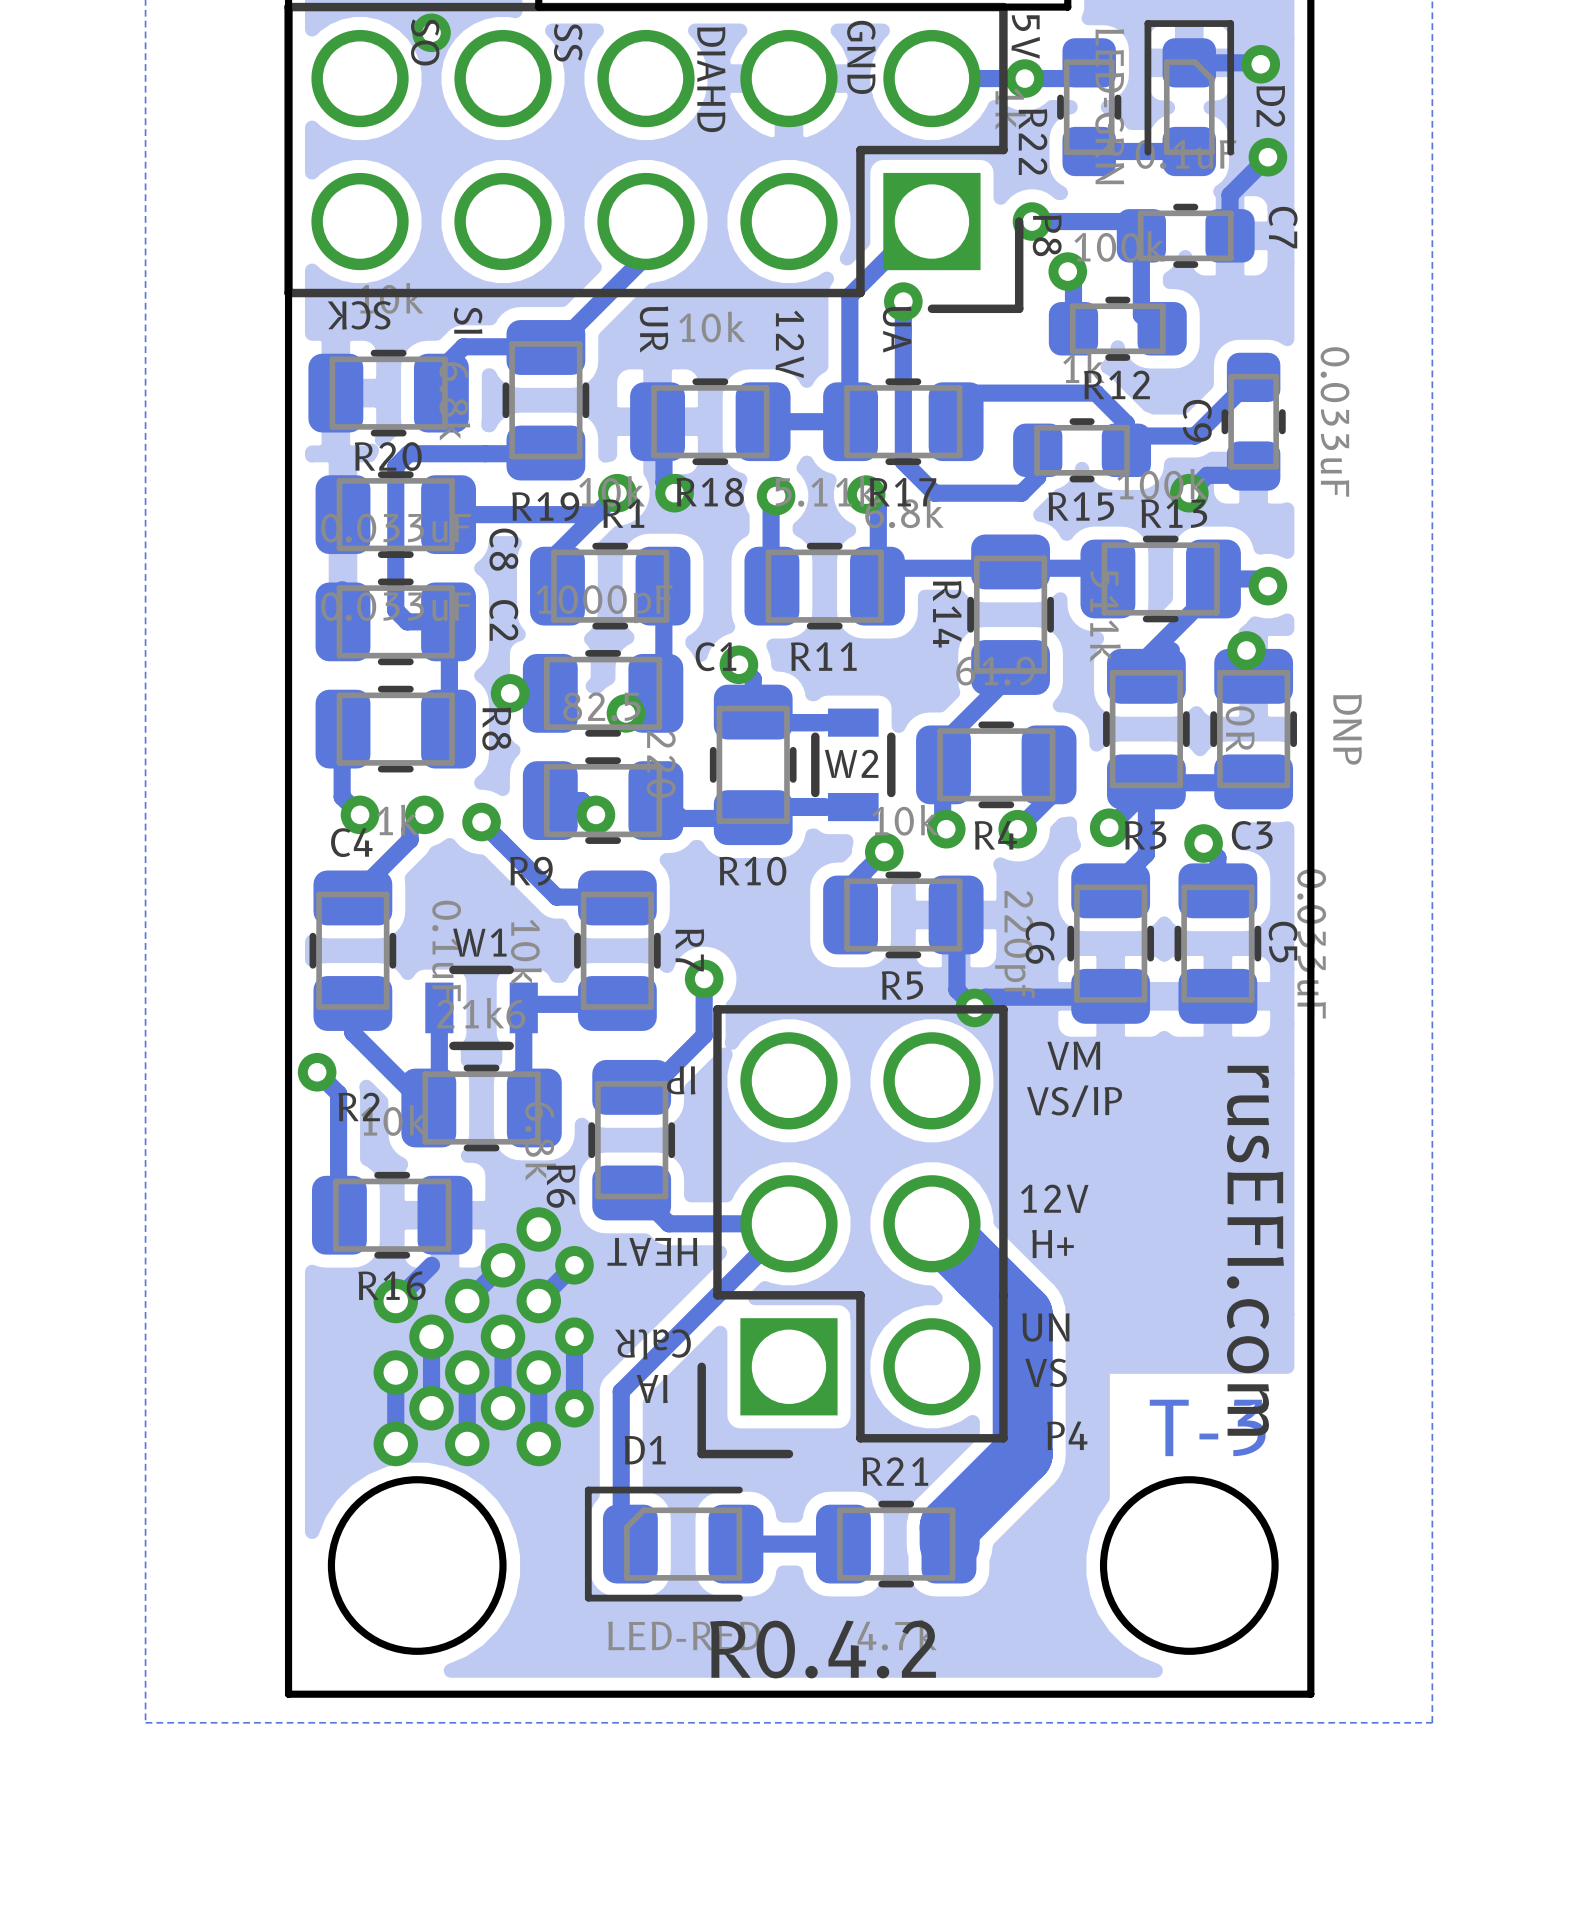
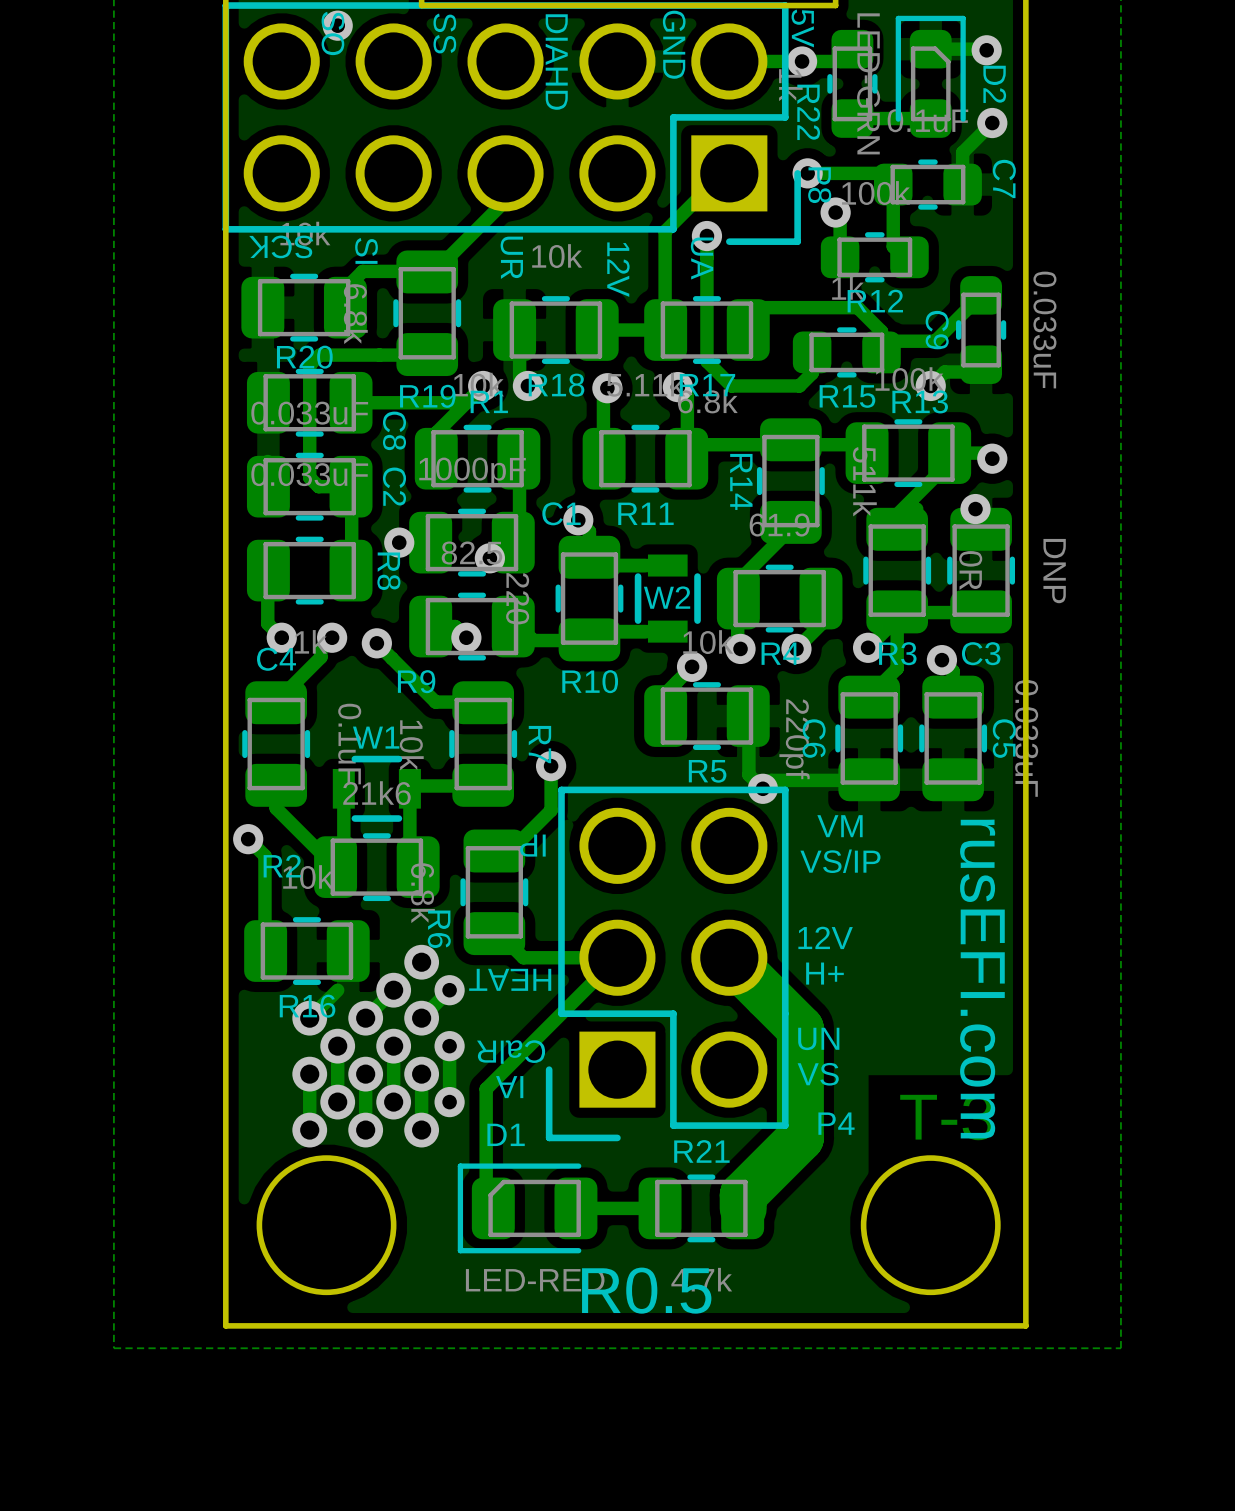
text: R0.4.2 (823, 1649) -> R0.5 (646, 1290)

